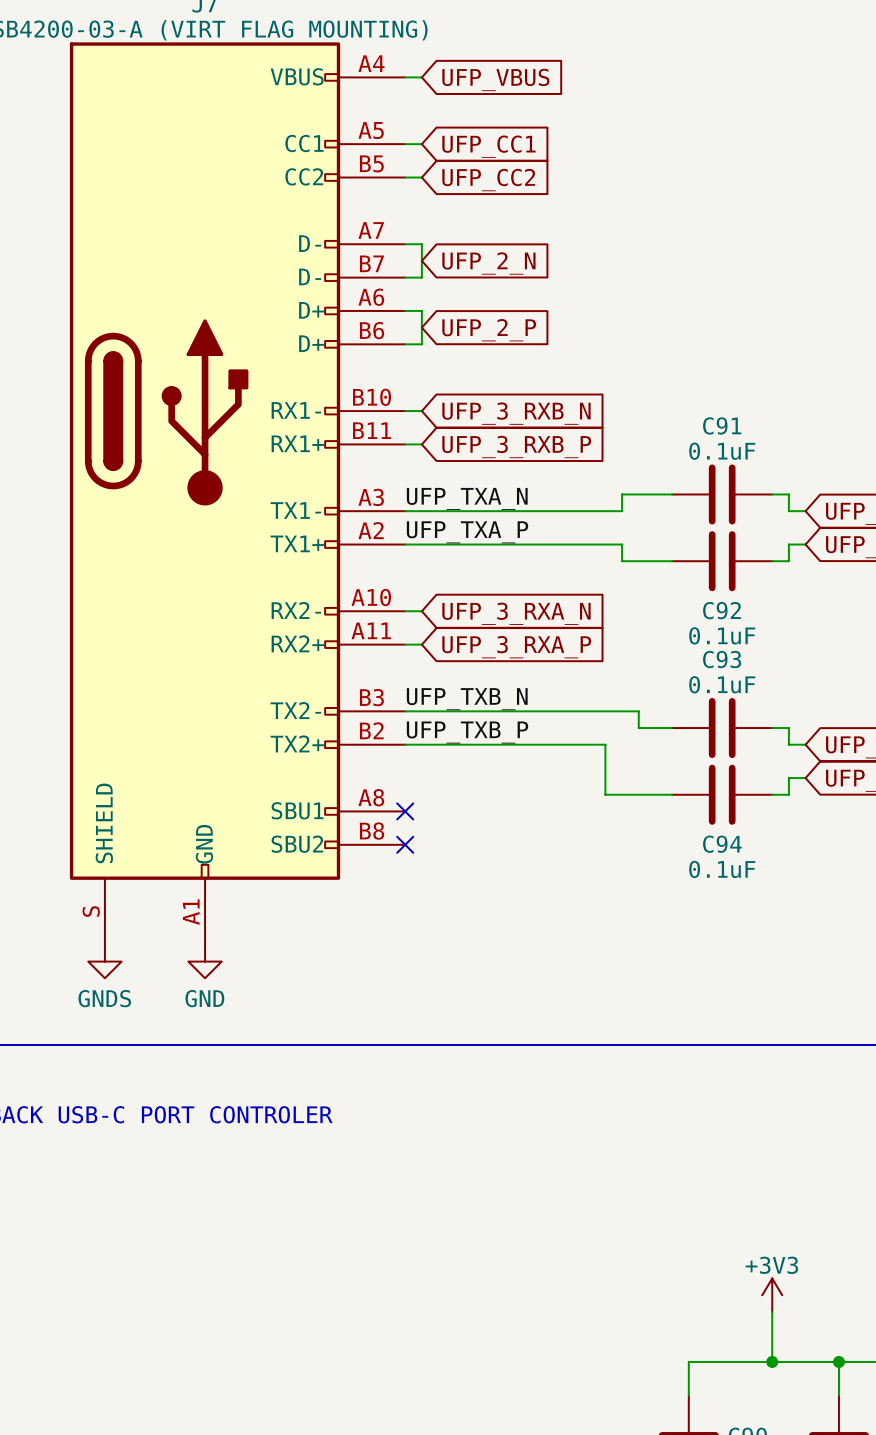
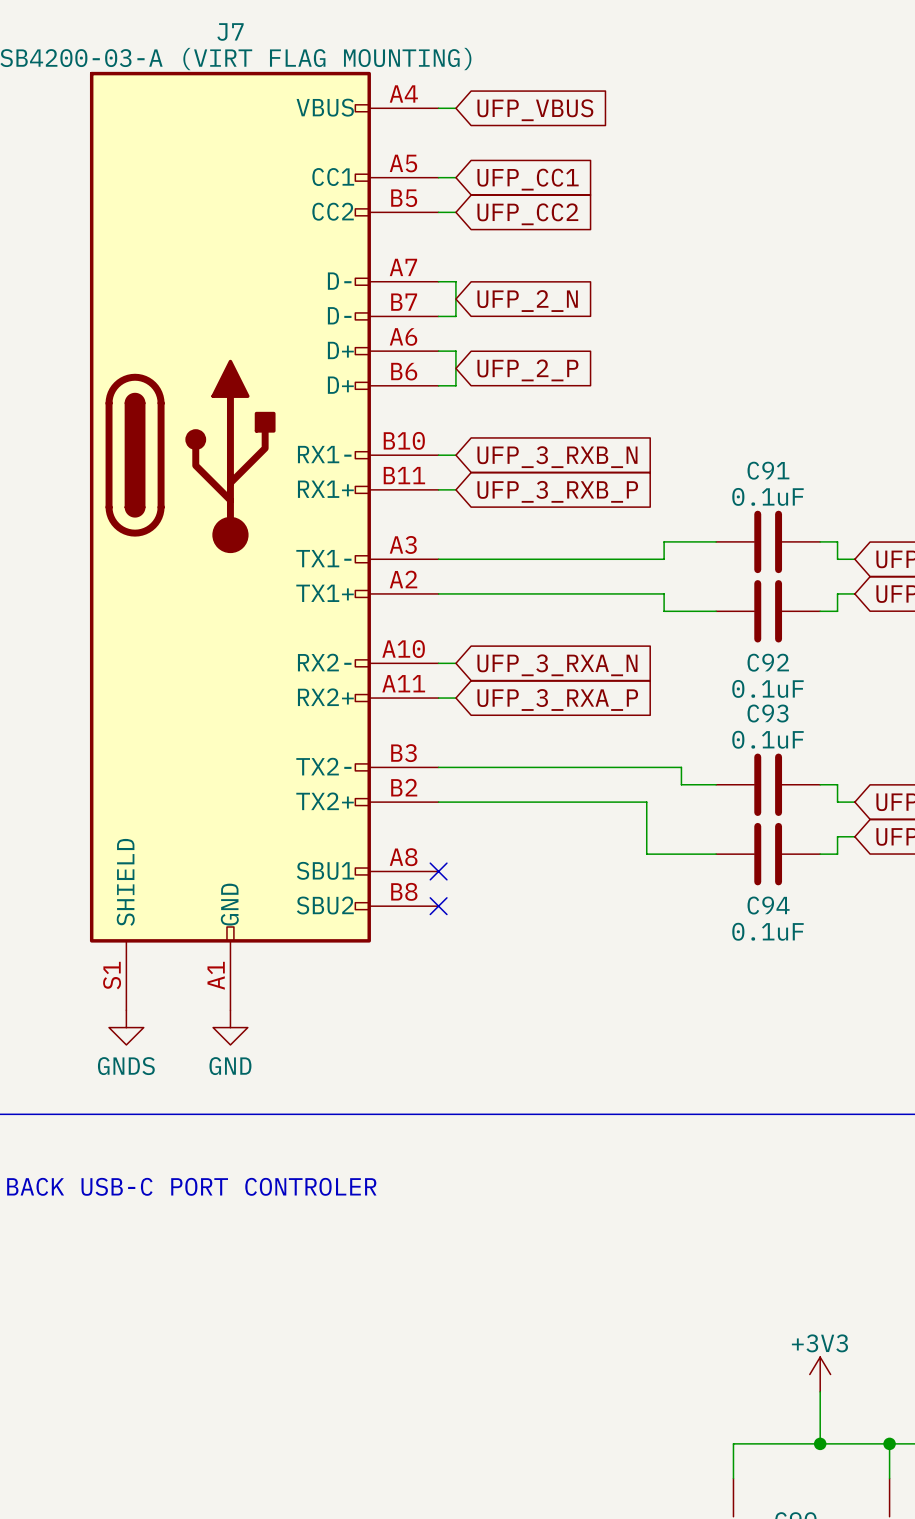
label: UFP_TXA_N (467, 498) -> none
label: UFP_TXA_P (467, 532) -> none
label: UFP_TXB_N (467, 699) -> none
label: UFP_TXB_P (467, 732) -> none
J7 pin number: S (91, 911) -> S1 (112, 975)

